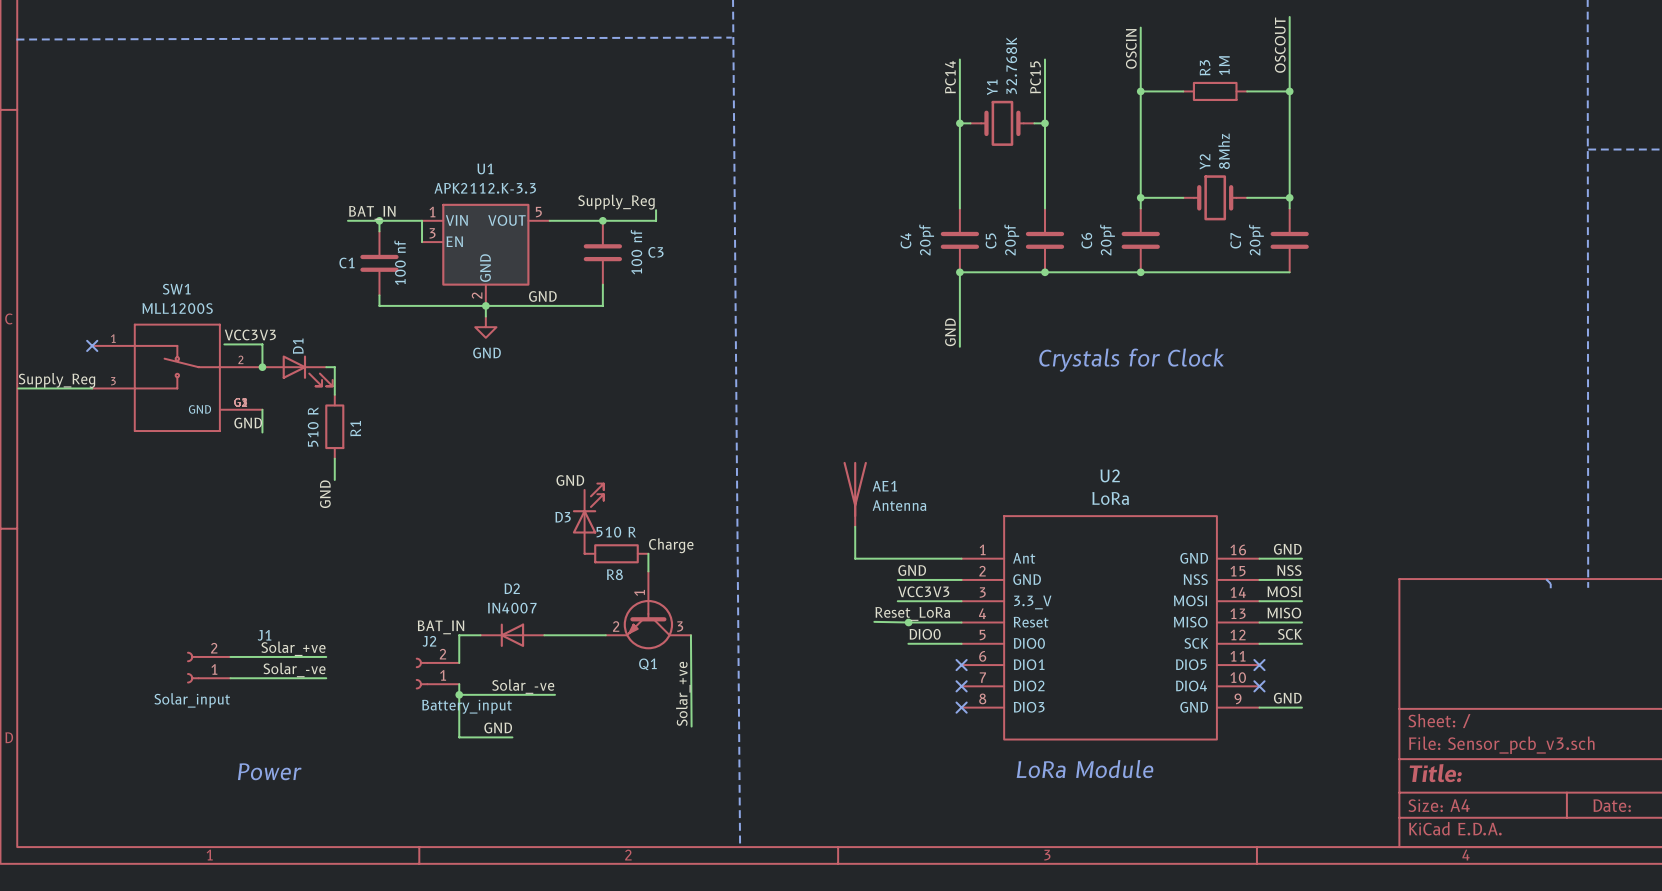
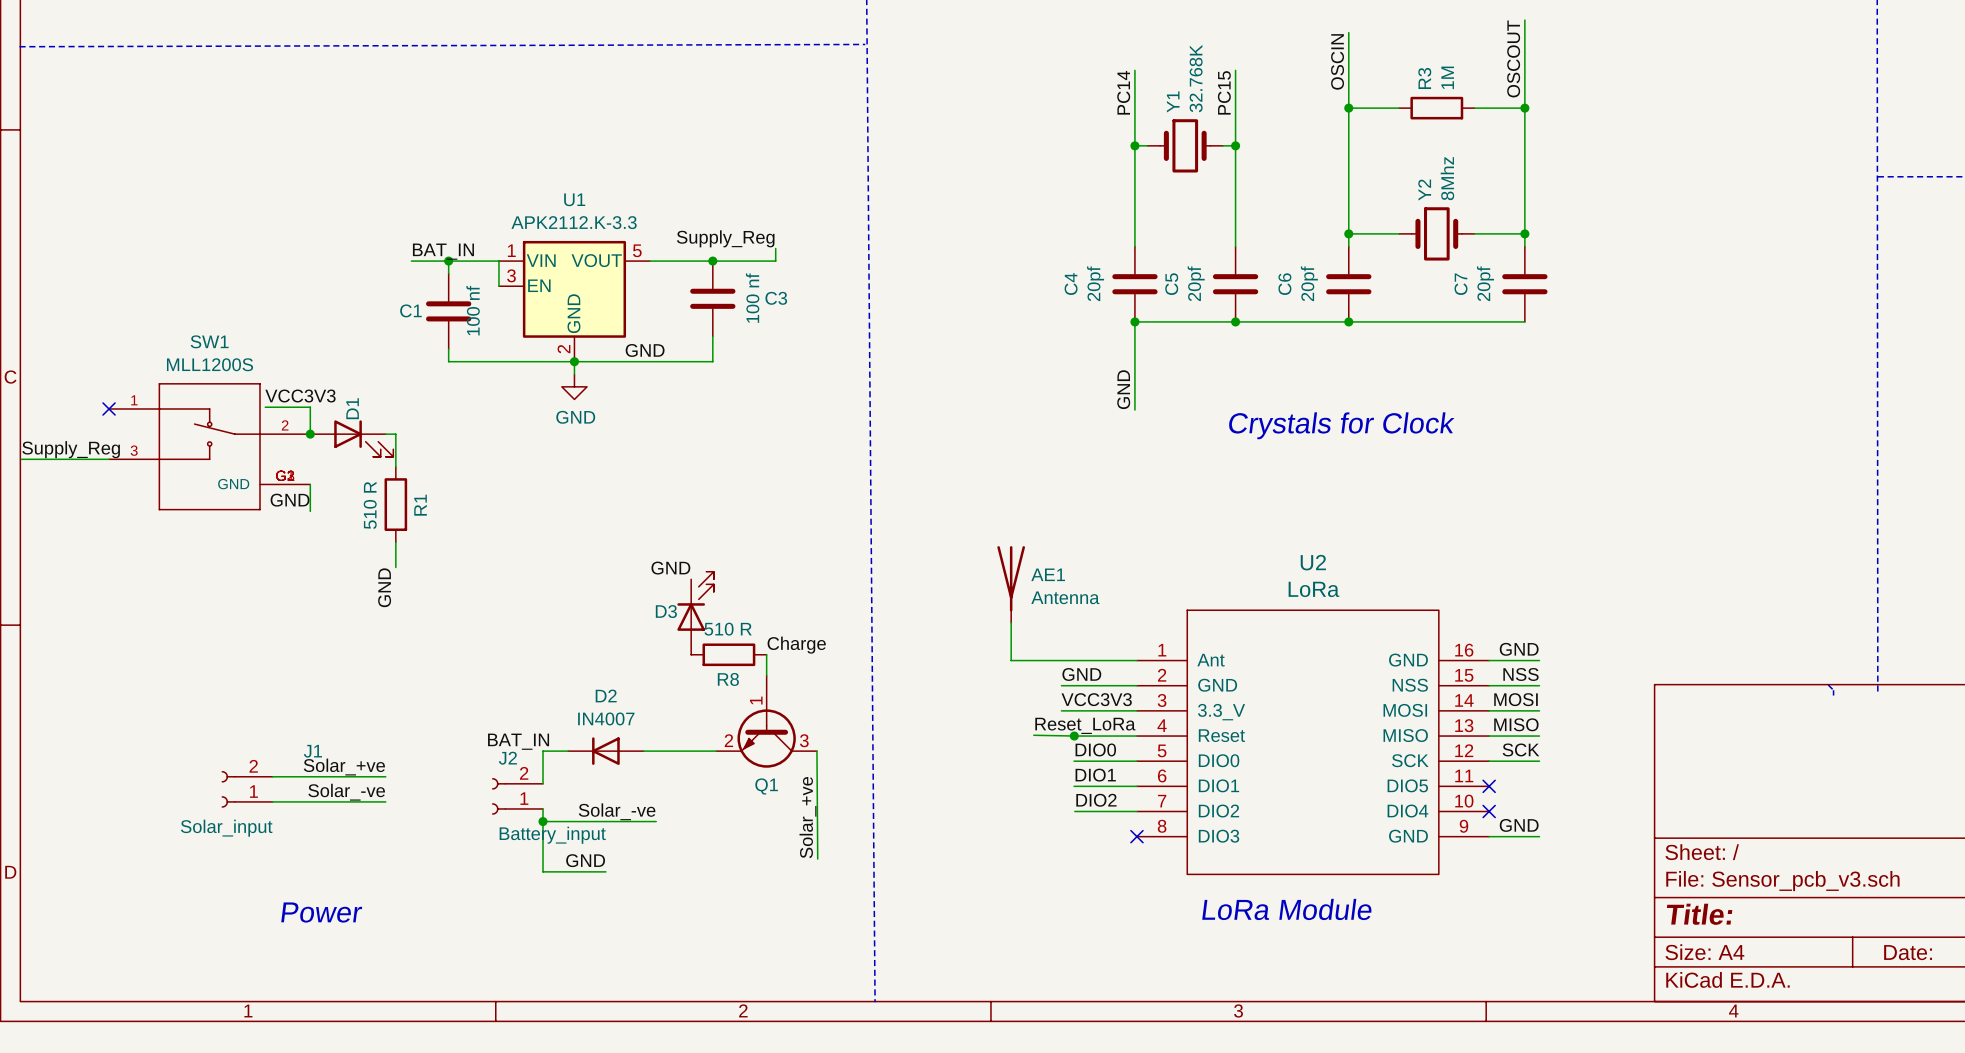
label: none -> DIO1 (1095, 775)
wire: none -> (1074, 786) (1136, 786)
no-connect mark: (961, 665) -> none
label: none -> DIO2 (1096, 800)
wire: none -> (1074, 811) (1136, 811)
no-connect mark: (961, 686) -> none

